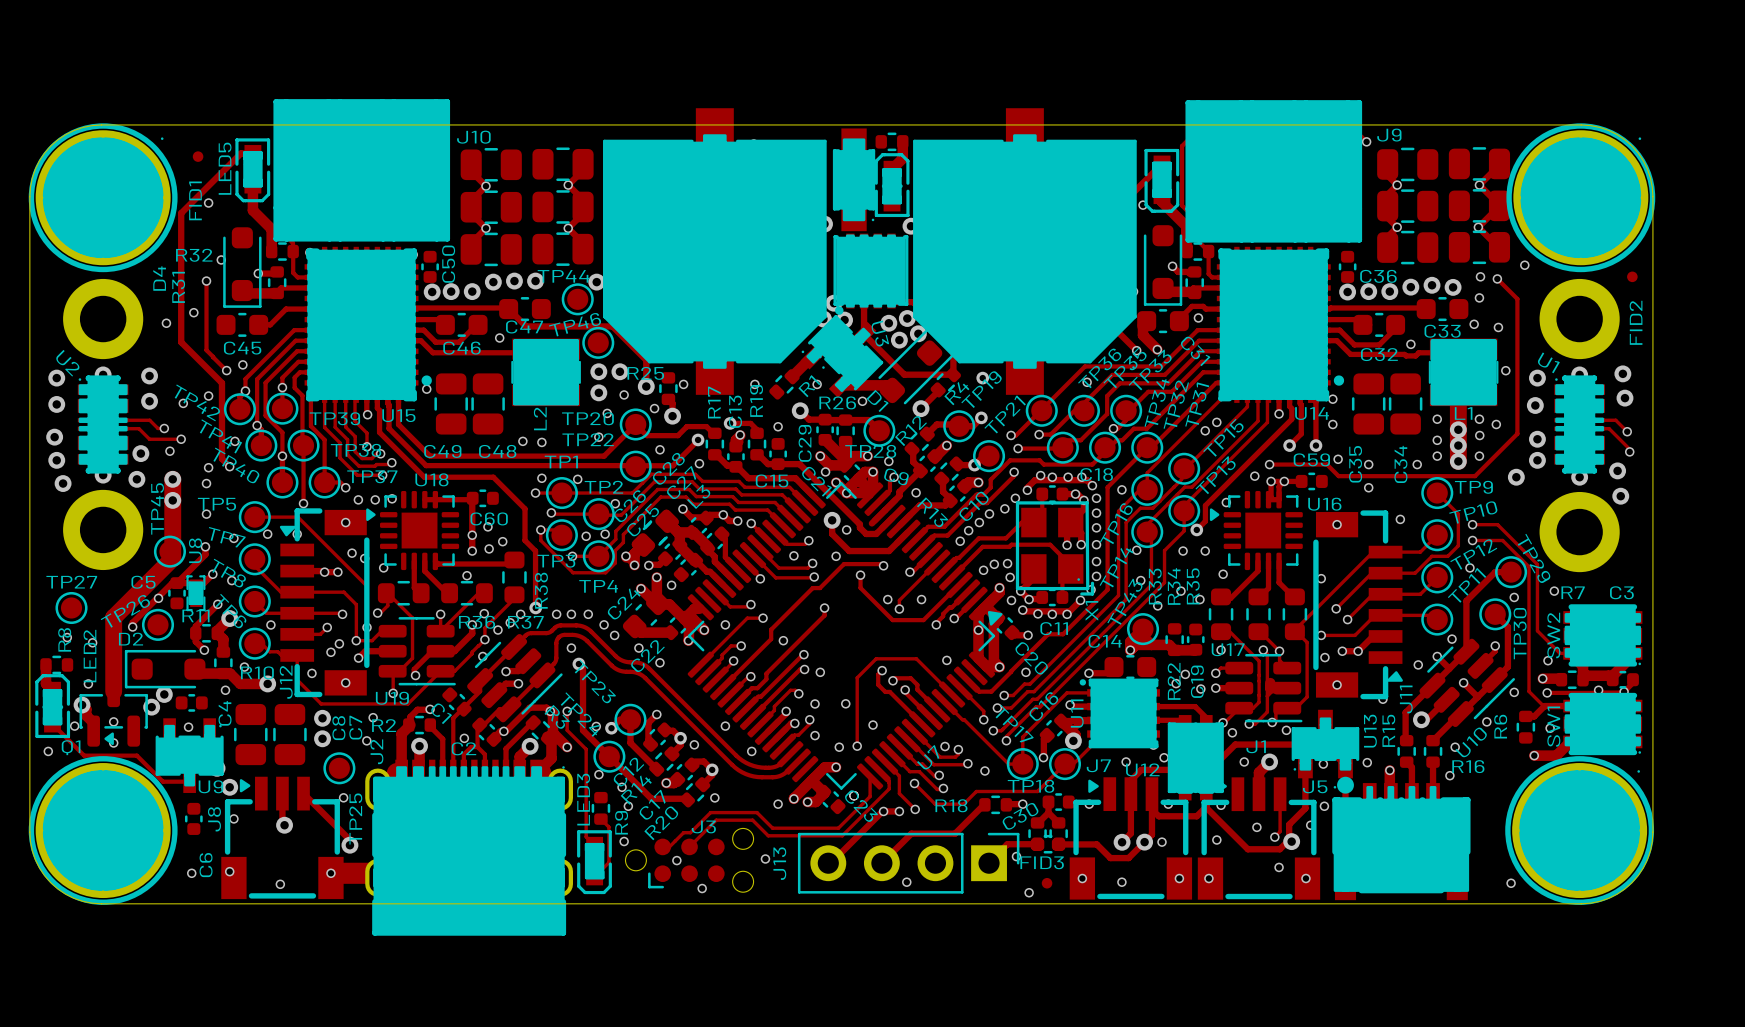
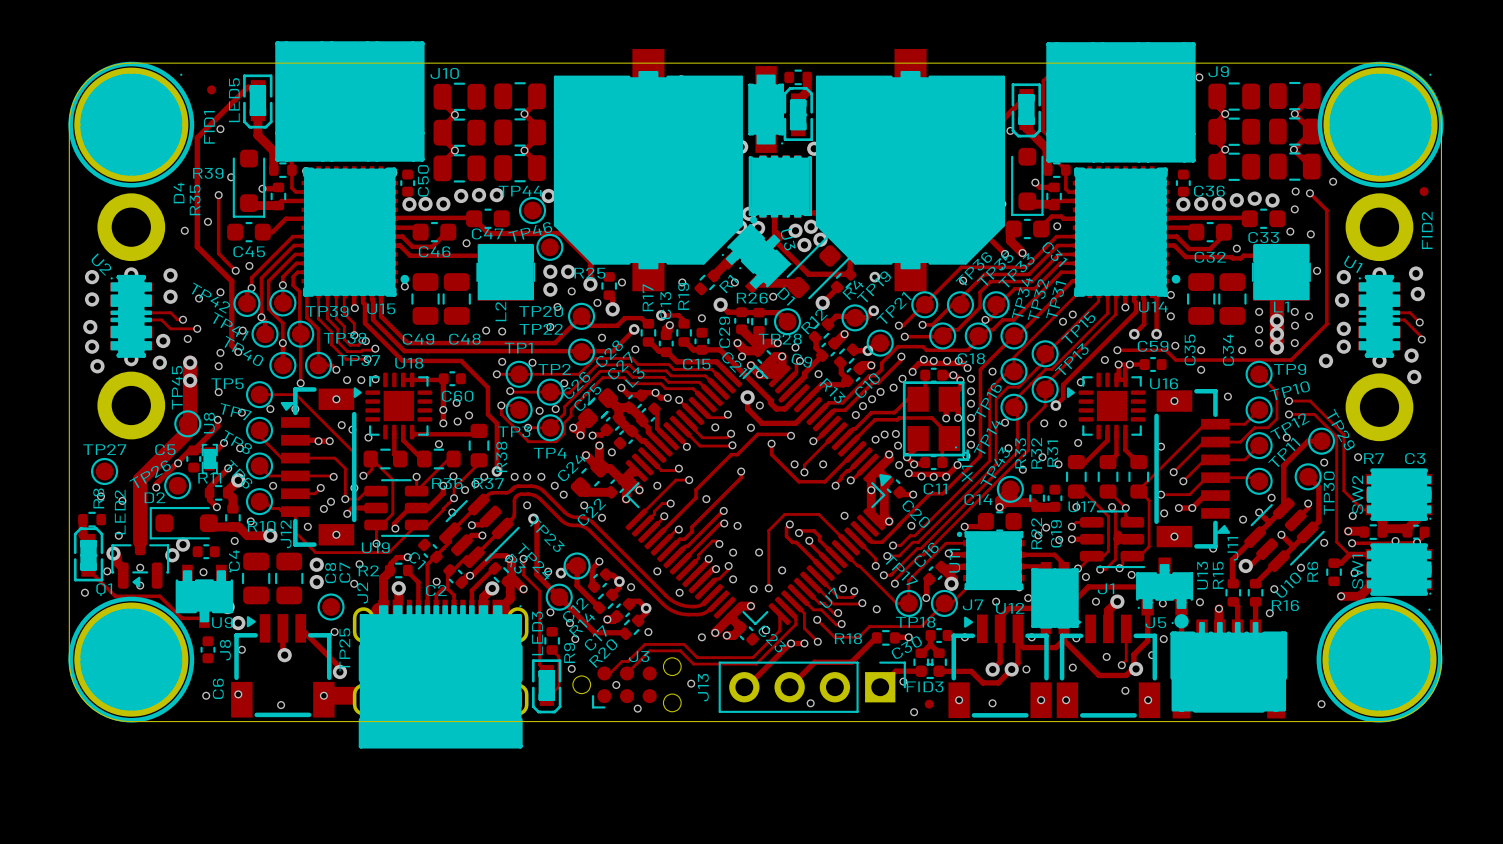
R32 name: R32 (194, 255) -> R39 (208, 173)
R31 name: R31 (178, 287) -> R35 (195, 200)
R34 name: R34 (1174, 586) -> R32 (1036, 453)
R35 name: R35 (1193, 586) -> R31 (1052, 453)

